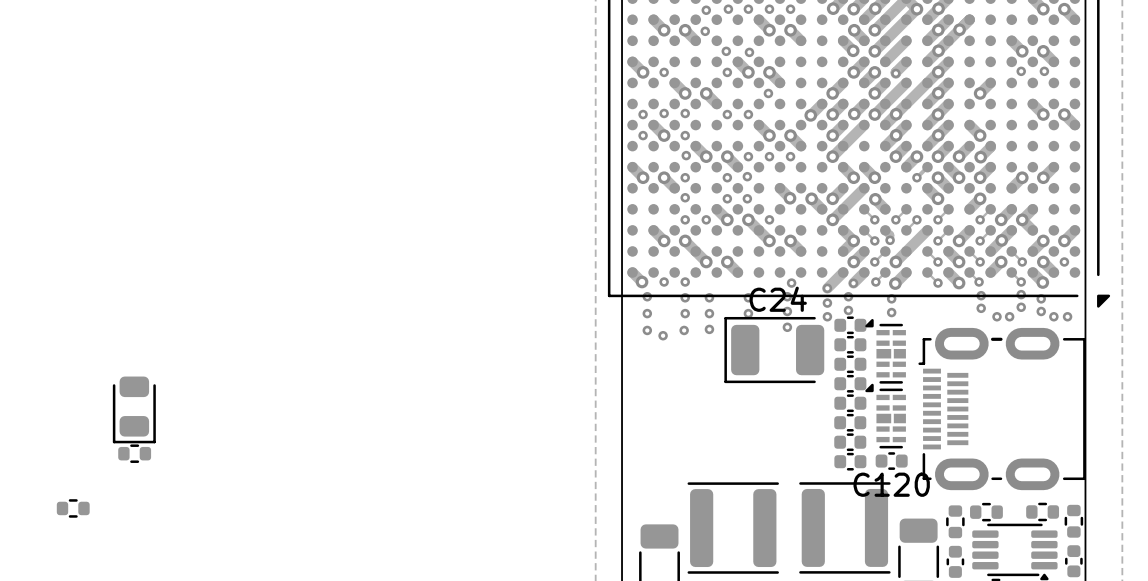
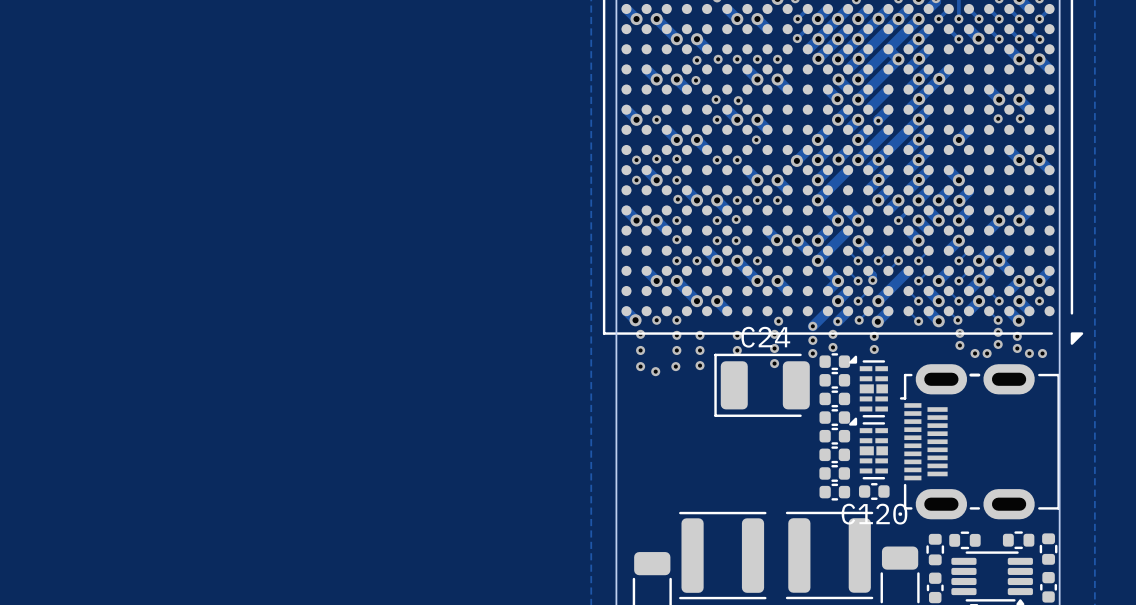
part: (134, 409) -> none
part: (134, 453) -> none
part: (73, 508) -> none

